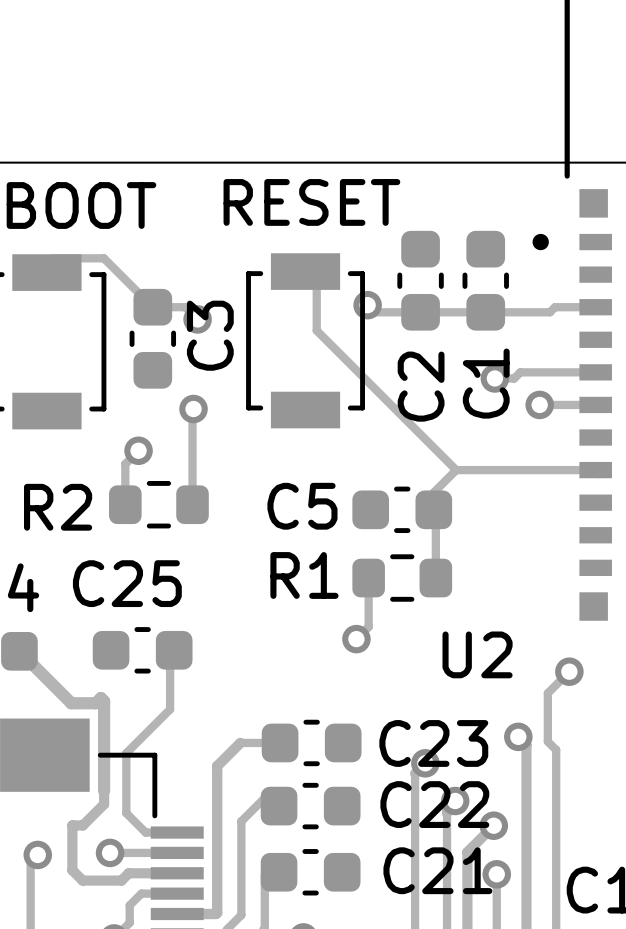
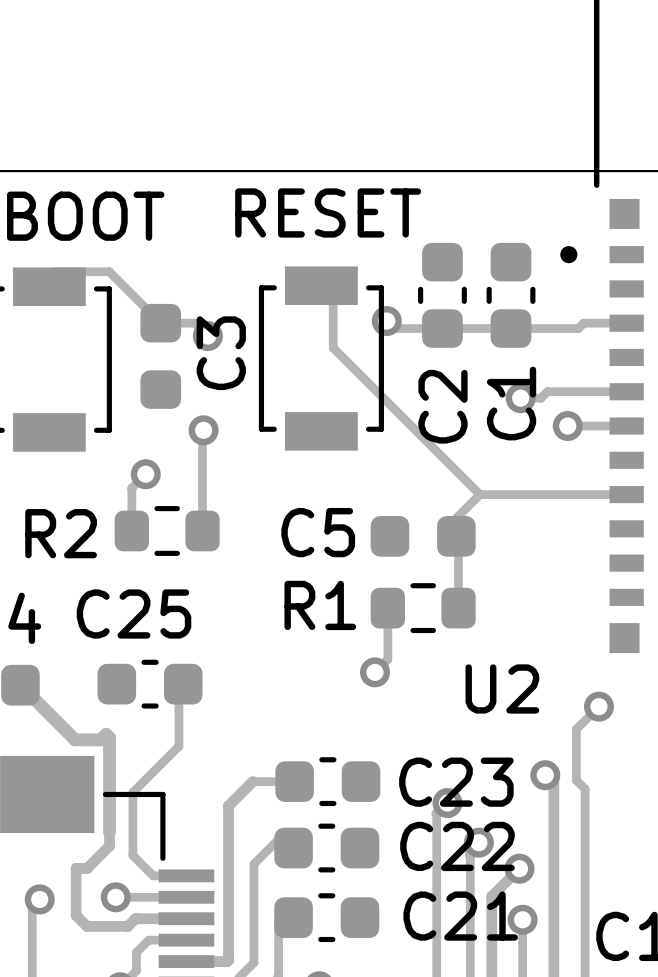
C3 footprint: [129, 288, 177, 389] -> [140, 303, 182, 409]
C5 footprint: [352, 486, 453, 534] -> [370, 515, 476, 557]

